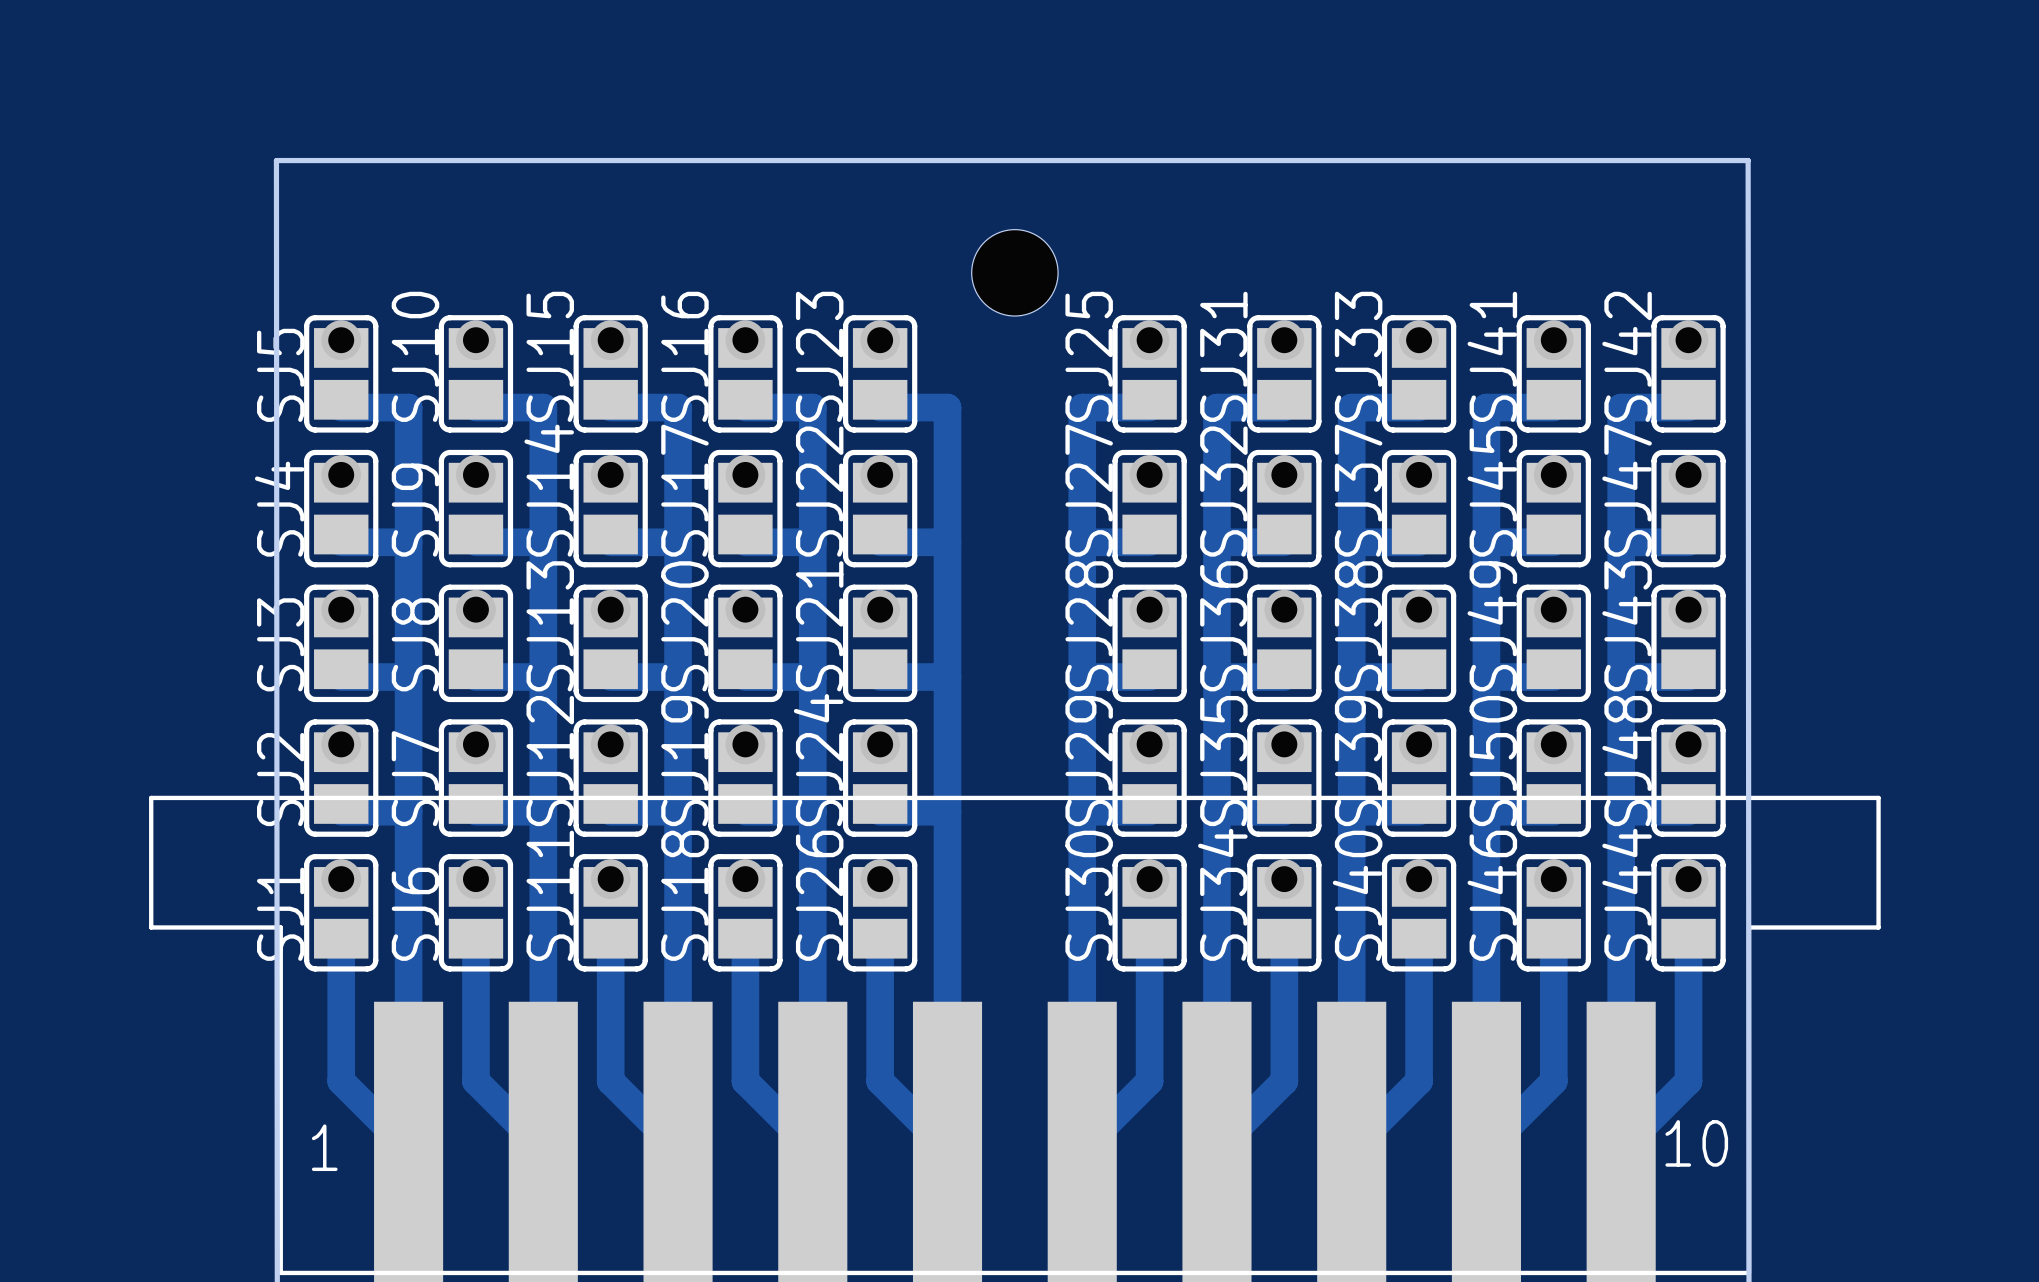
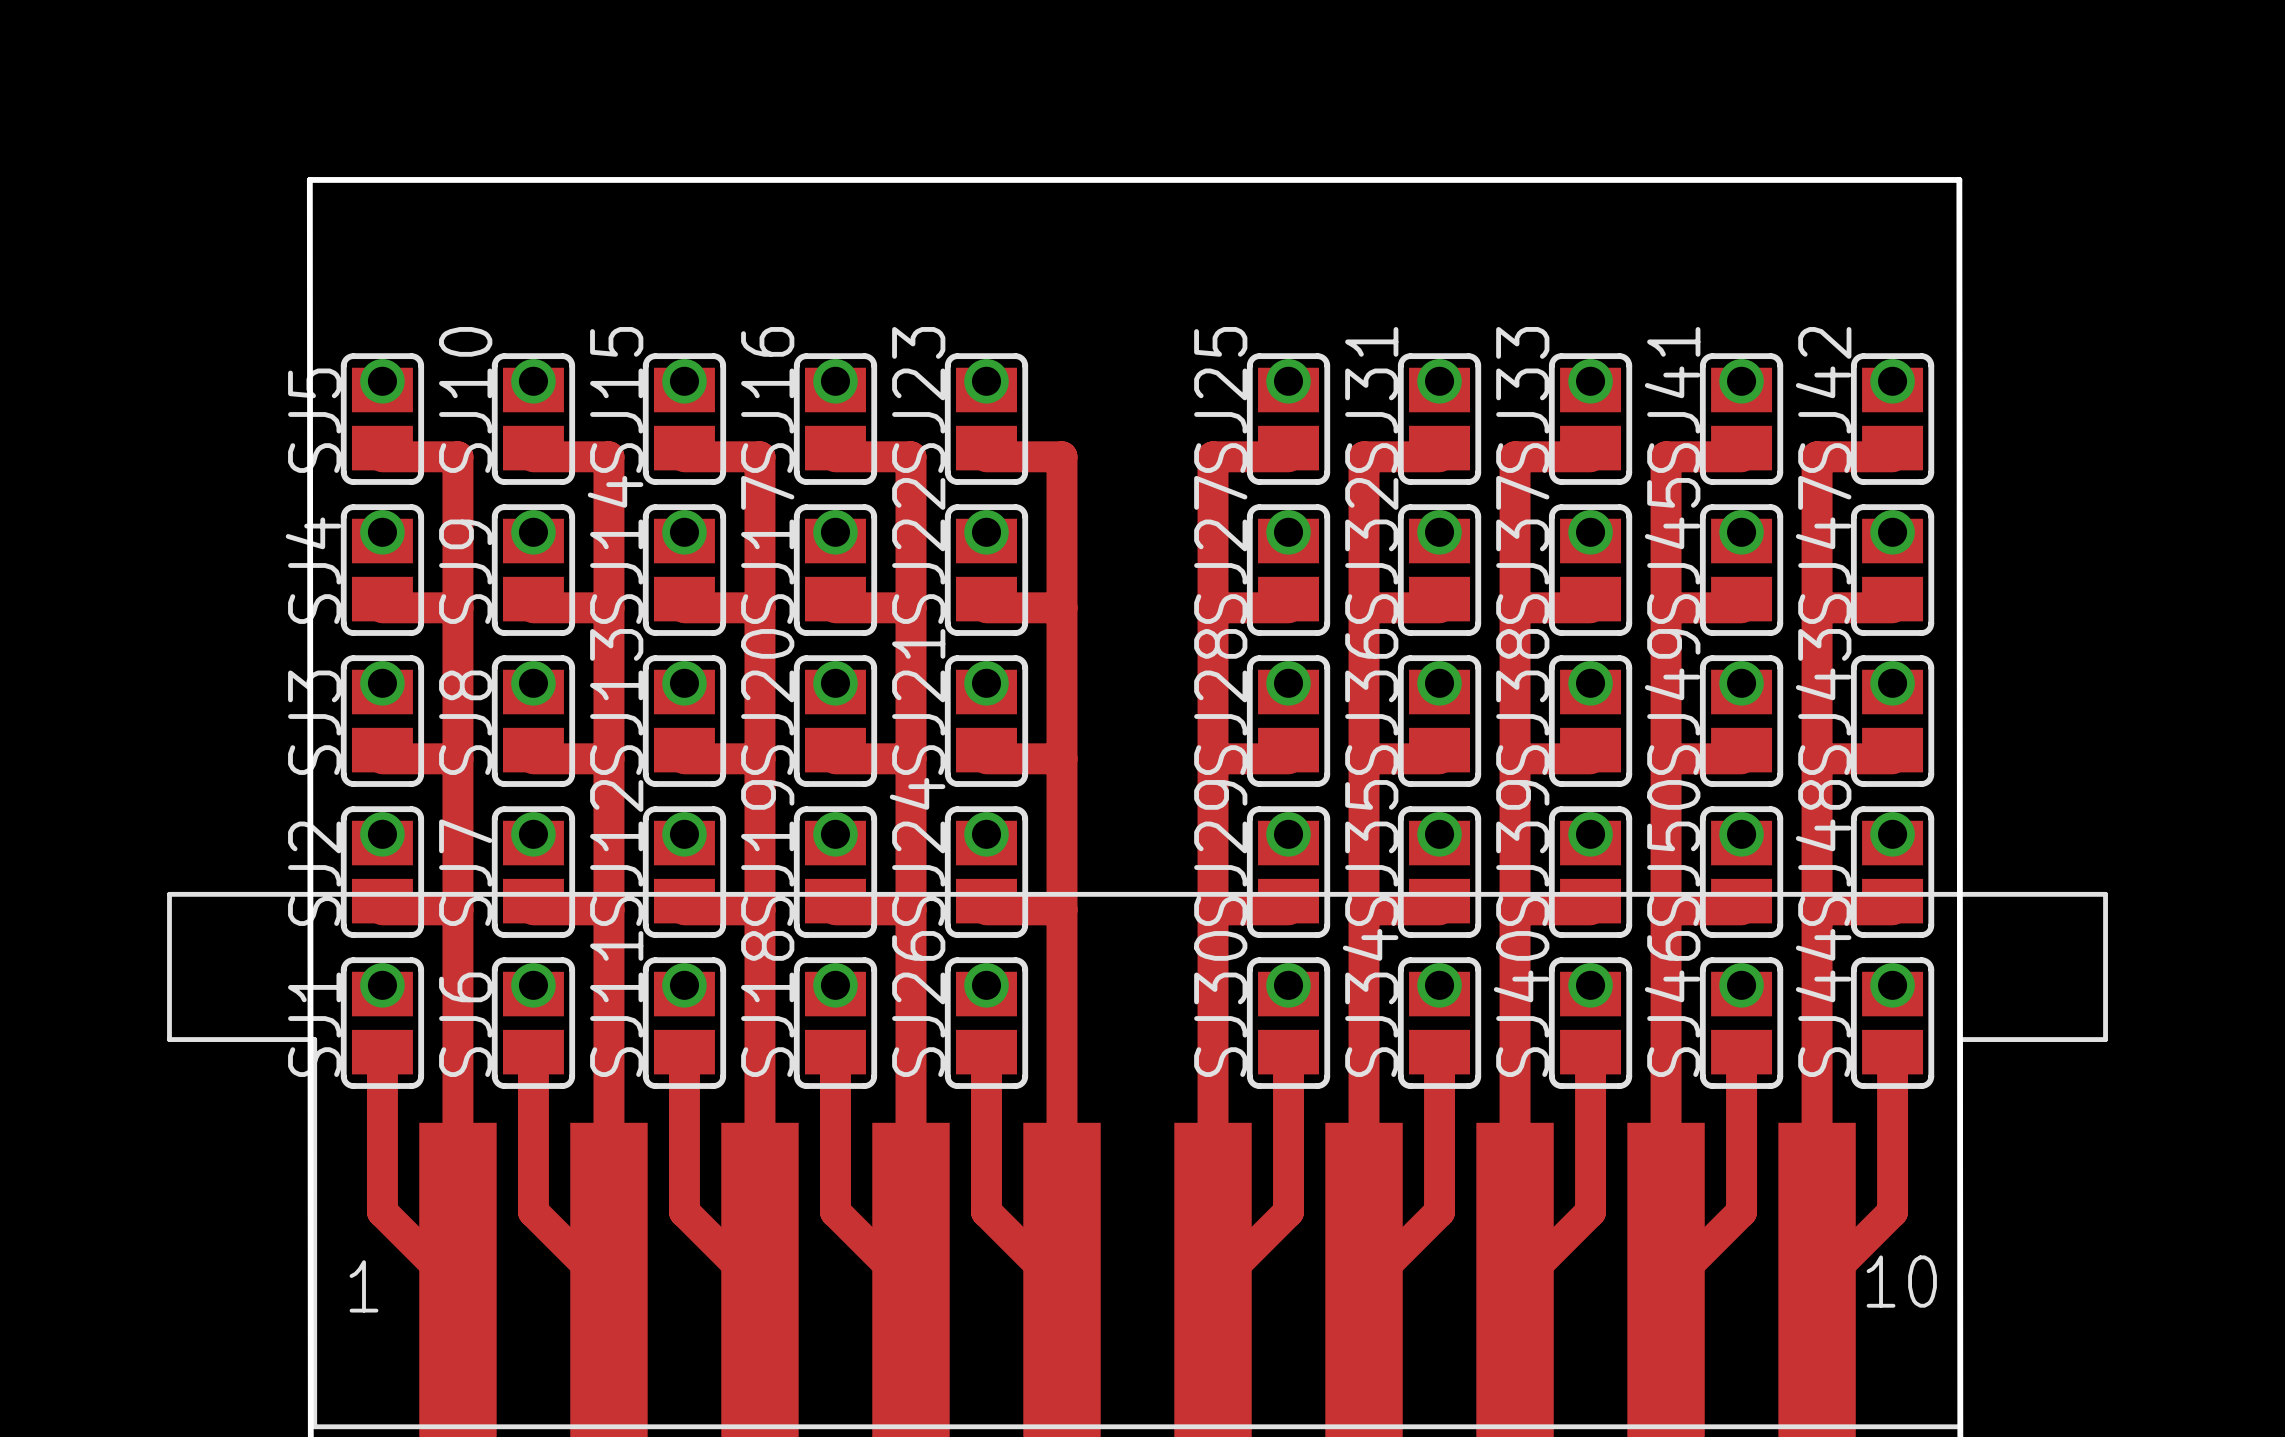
hole: (1014, 272) -> none

